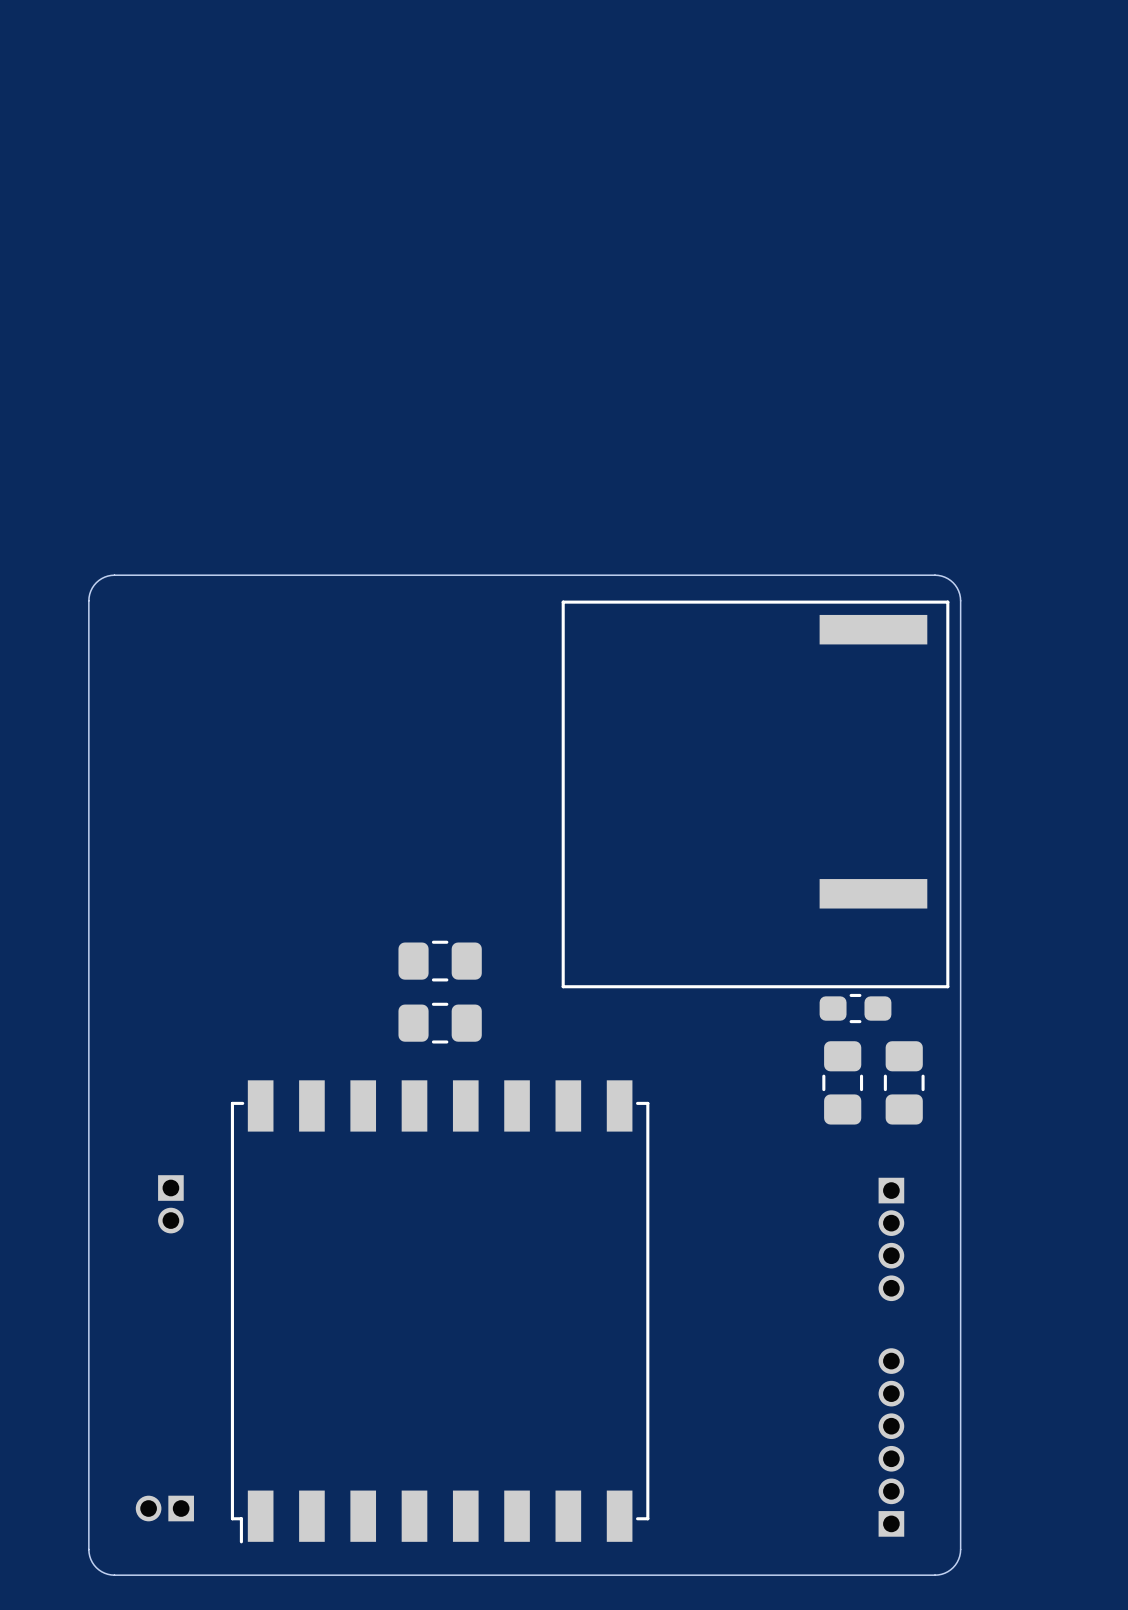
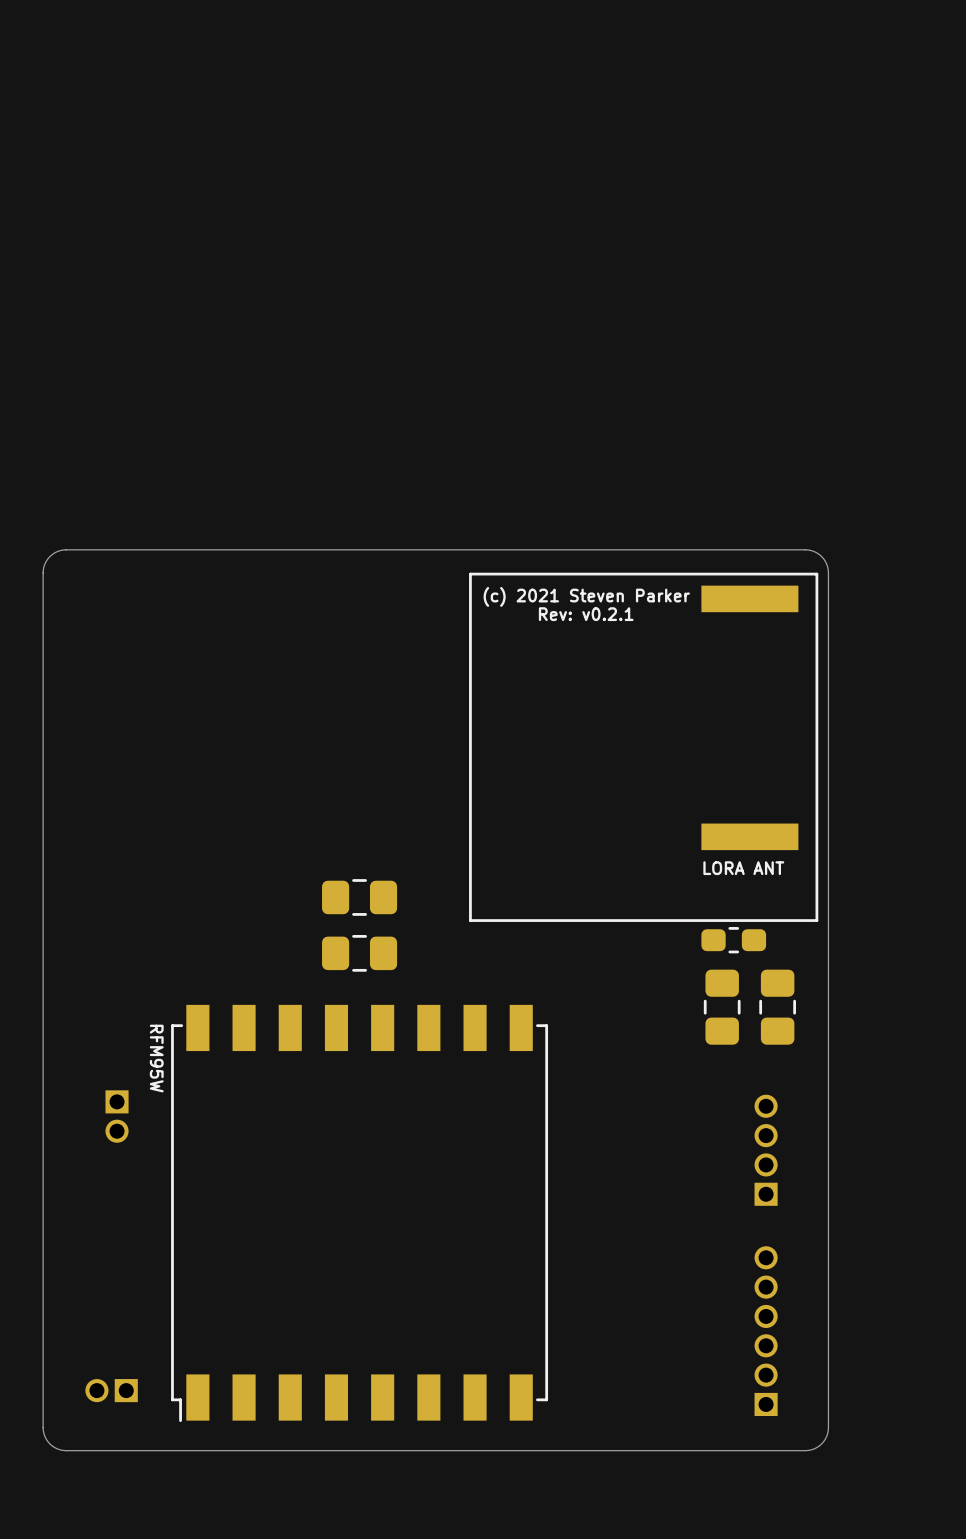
text: none -> (c) 2021 Steven Parker (586, 596)
text: none -> Rev: v0.2.1 (586, 614)
text: none -> LORA ANT (743, 868)
text: none -> RFM95W (156, 1058)
part rotation: 0° (891, 1239) -> 180° (766, 1150)

